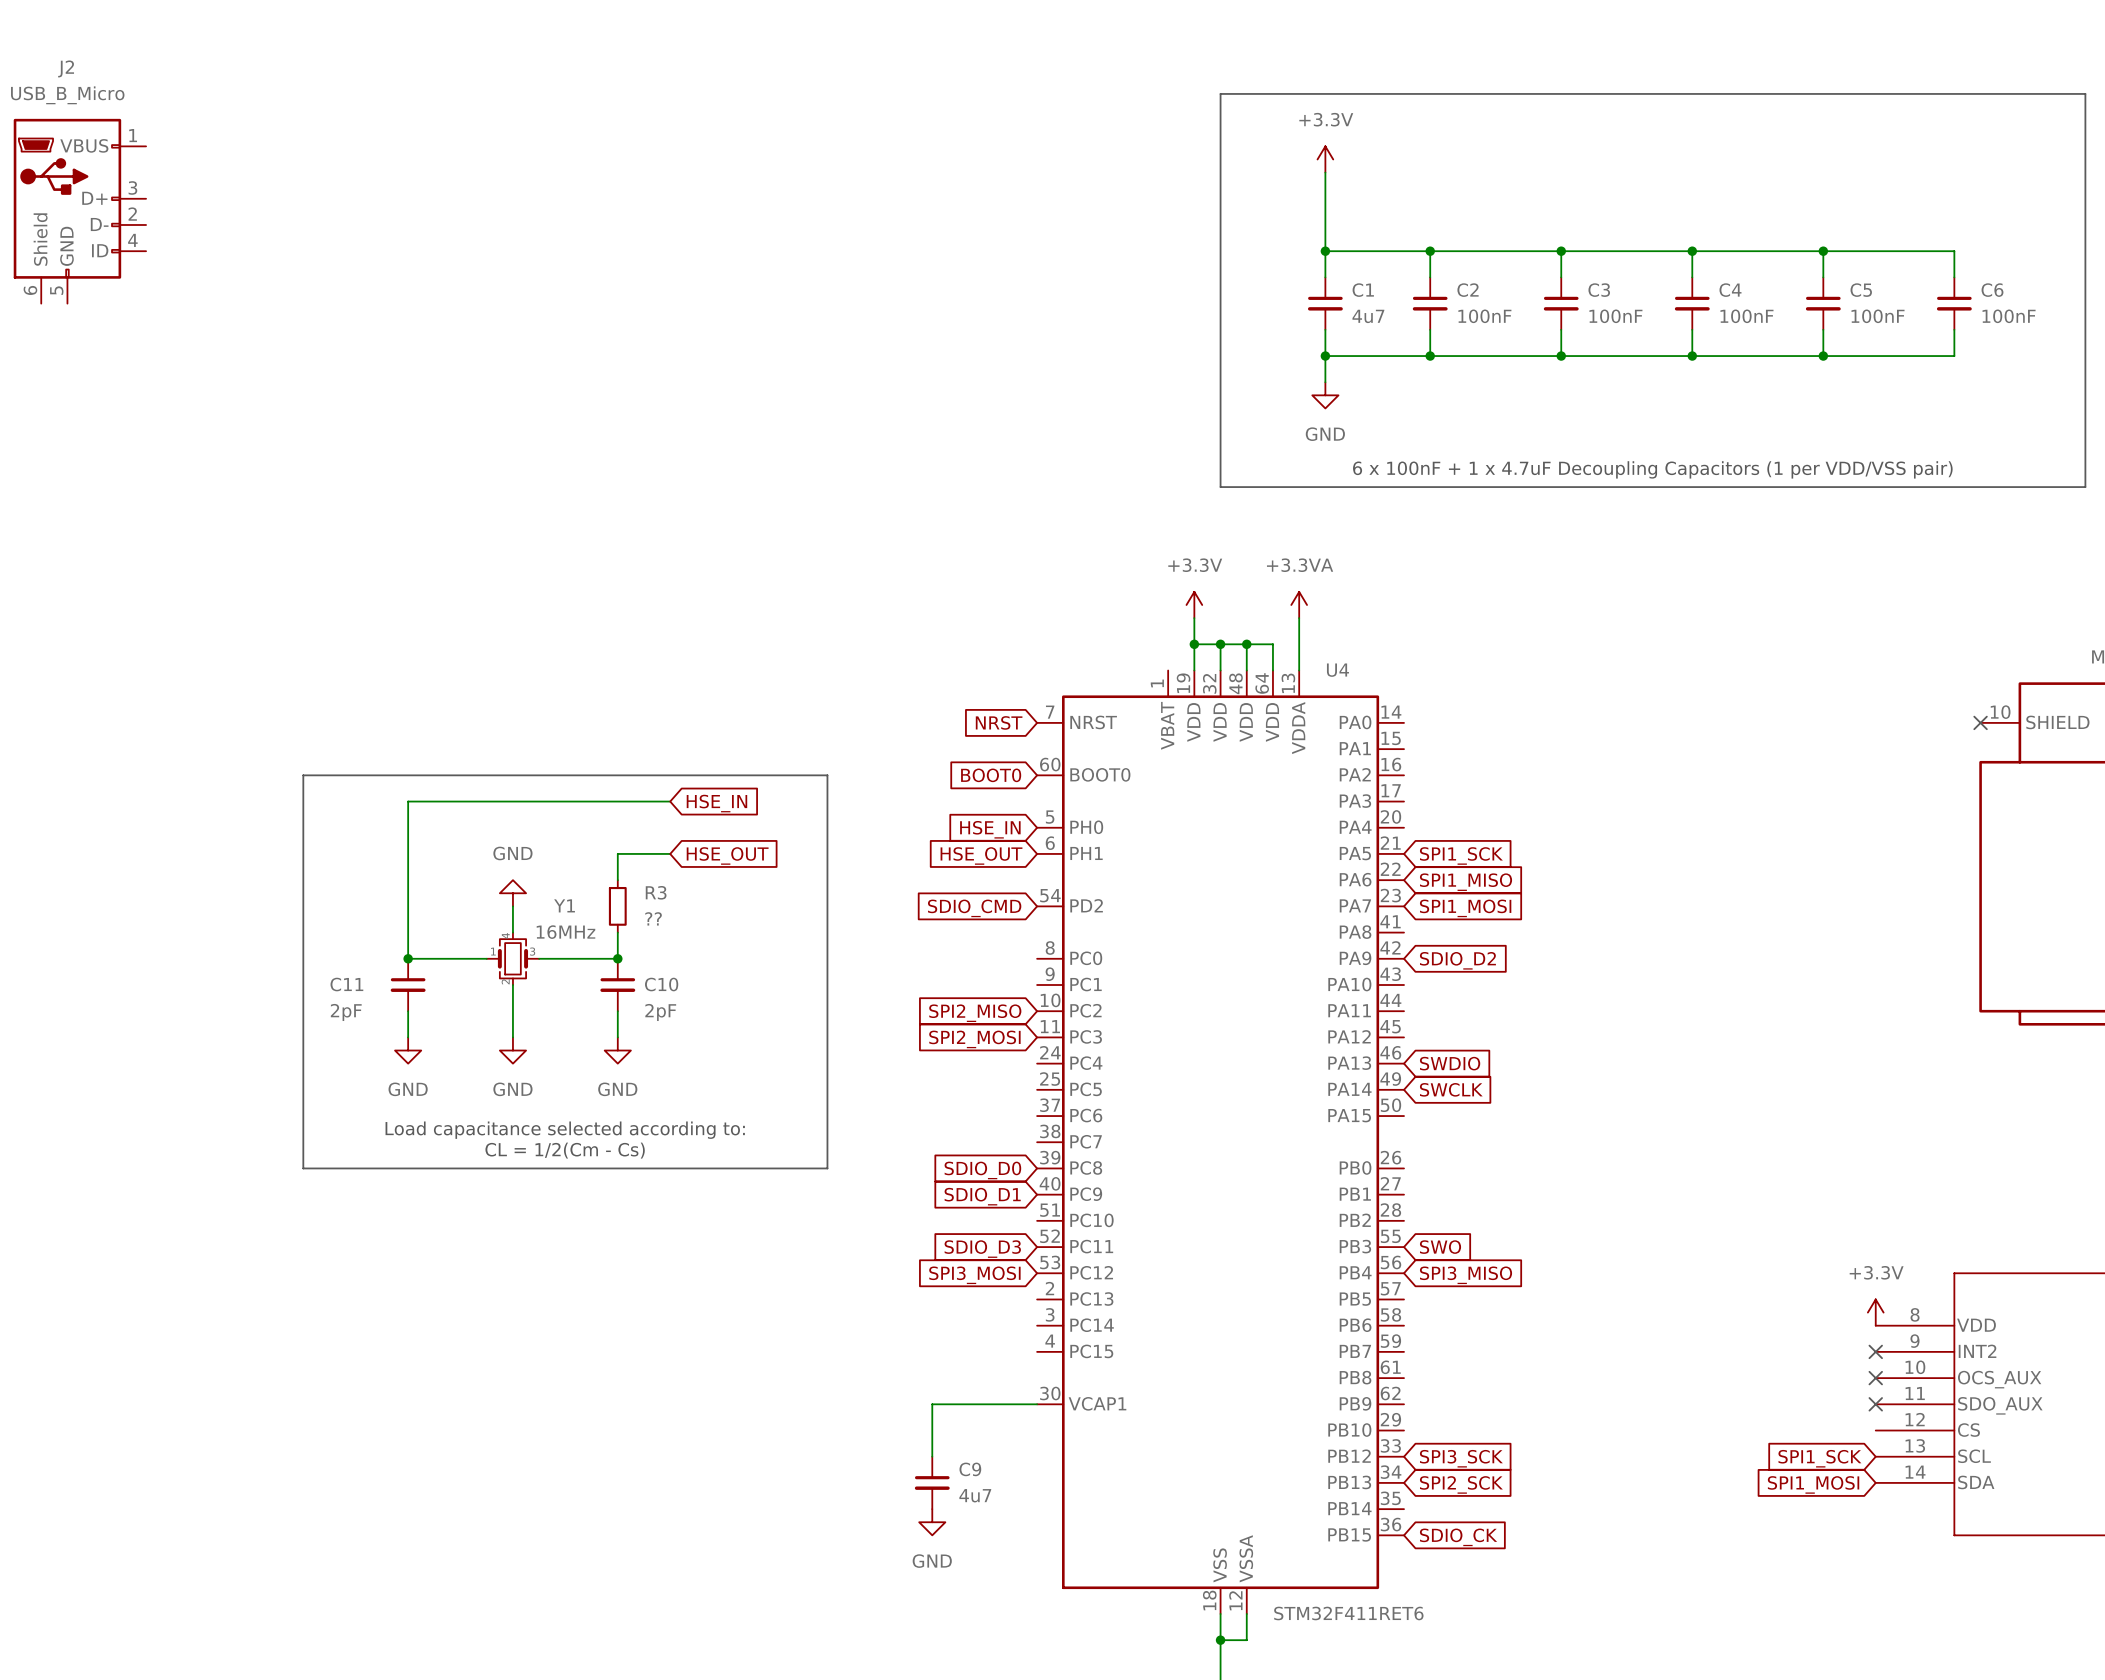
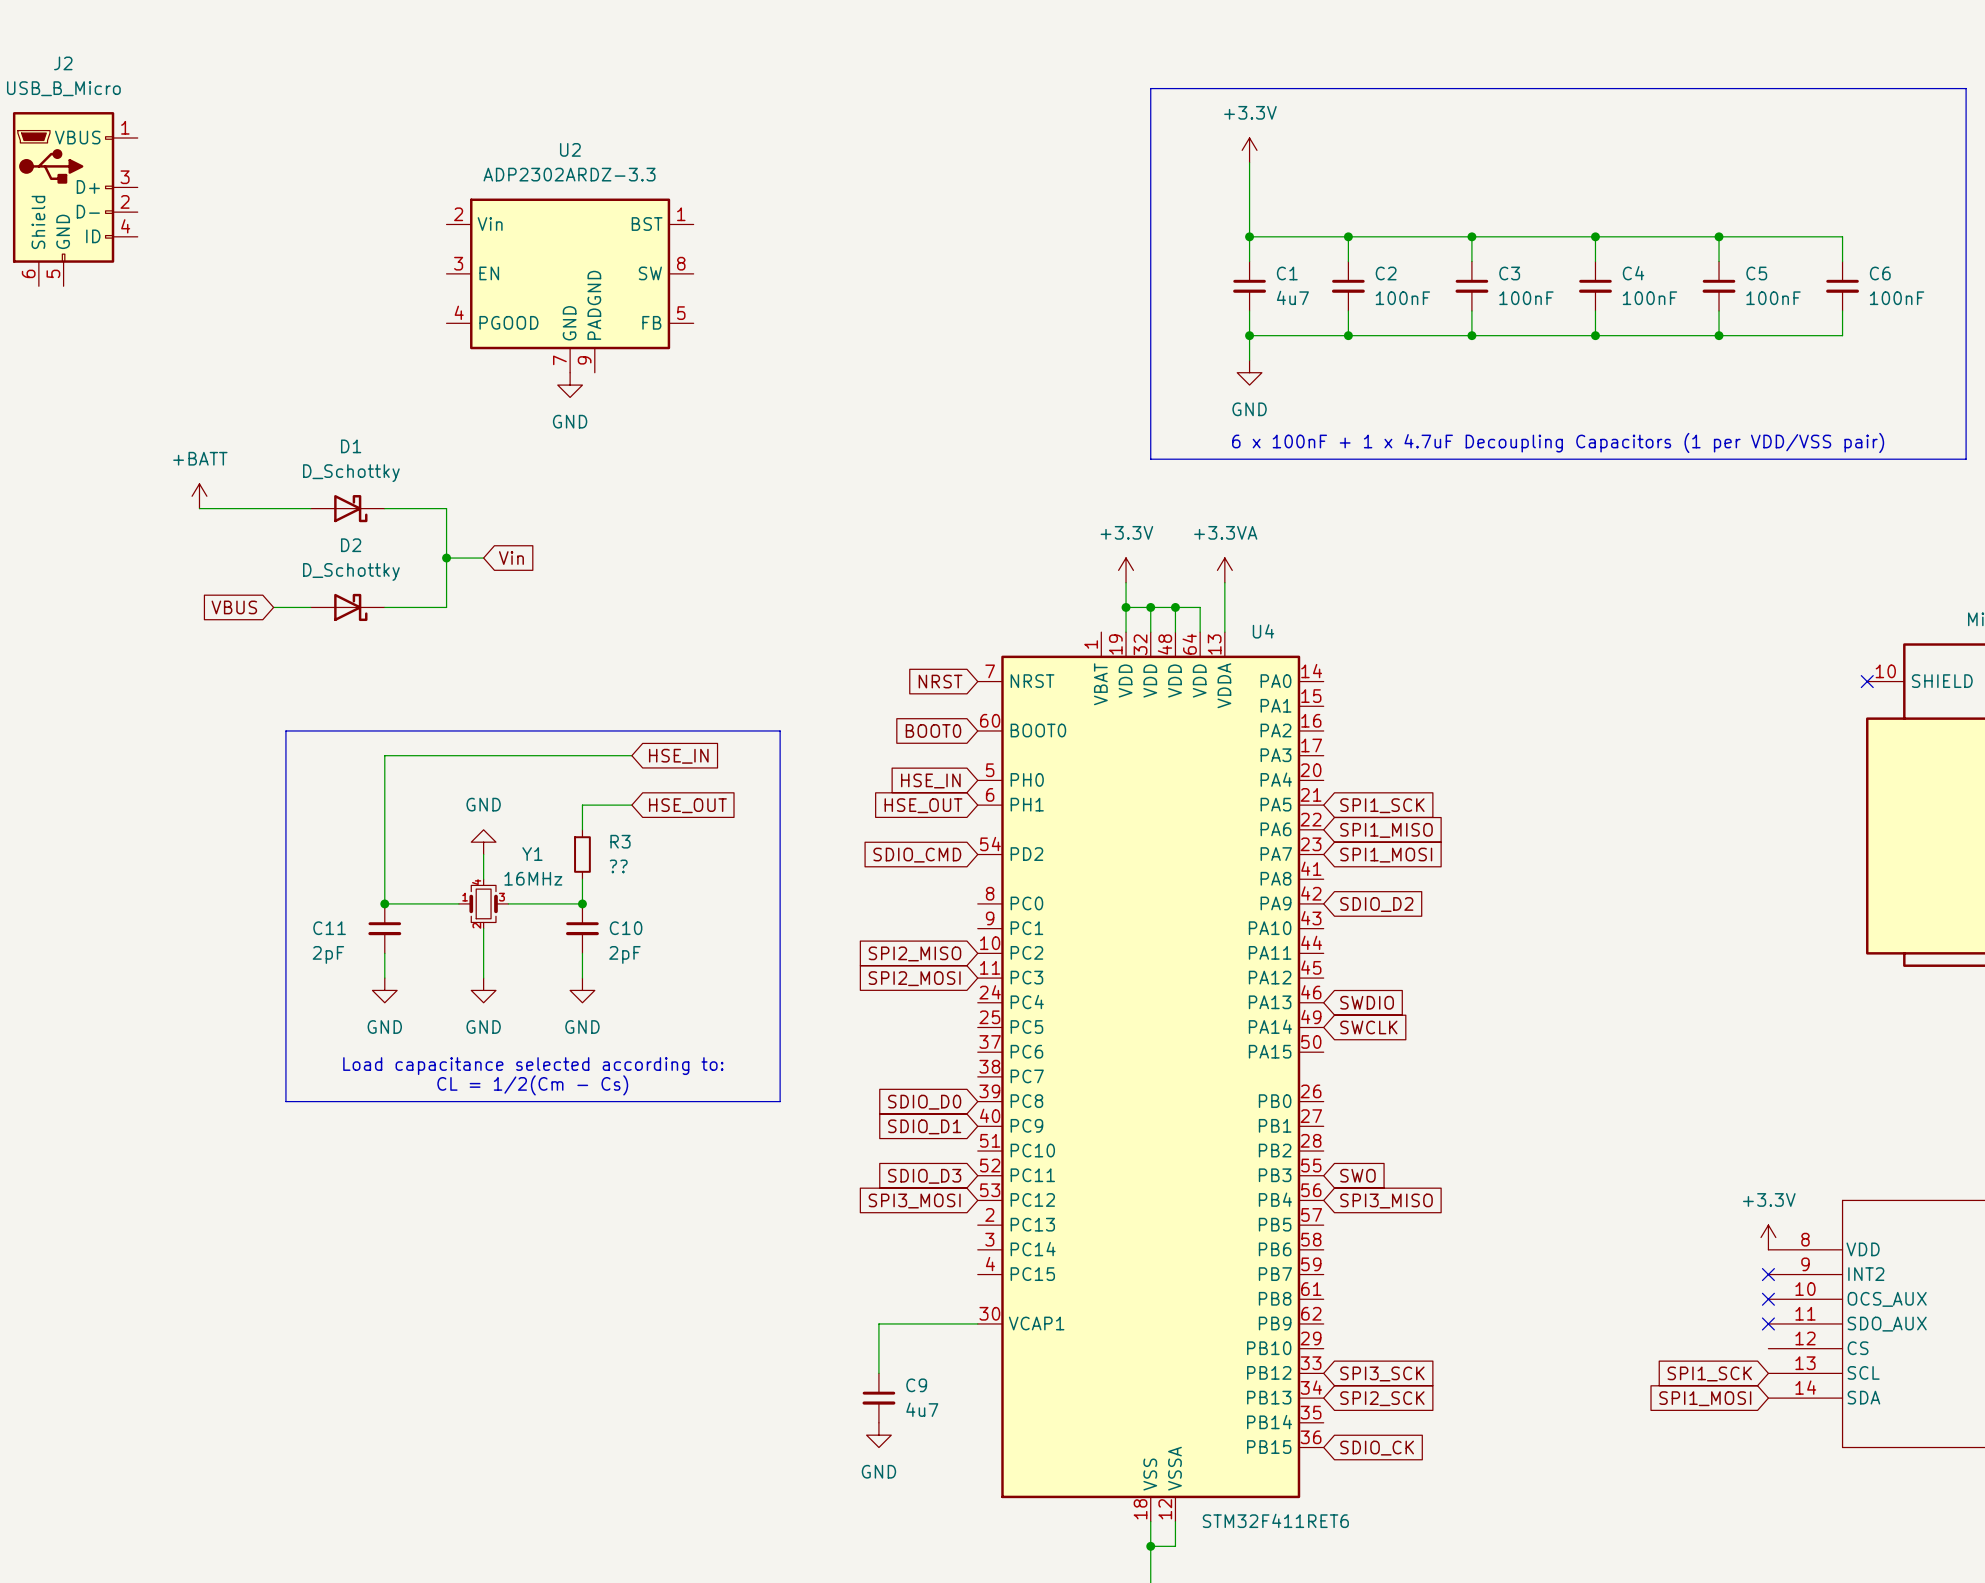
U2: none -> ADP2302ARDZ-3.3 (570, 285)
power symbol: none -> GND (570, 385)
power symbol: none -> +BATT (199, 496)
wire: none -> (199, 508) (310, 508)
D1: none -> D_Schottky (347, 508)
wire: none -> (384, 508) (446, 508) (446, 607) (384, 607)
wire: none -> (446, 558) (483, 558)
junction: none -> (446, 558)
global label: none -> Vin (511, 558)
global label: none -> VBUS (234, 607)
wire: none -> (273, 607) (310, 607)
D2: none -> D_Schottky (347, 607)

